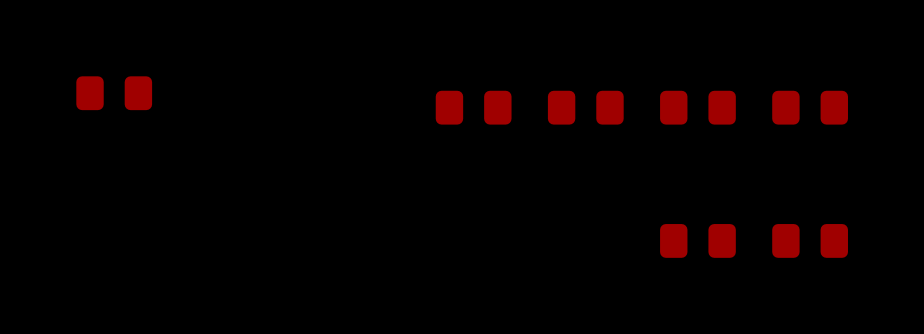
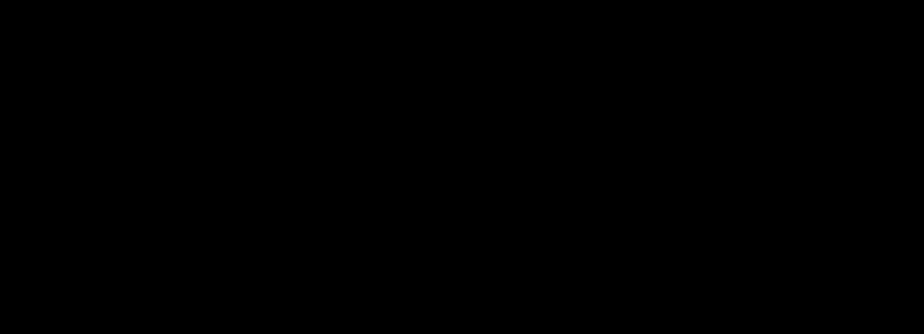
part: (114, 93) -> none
part: (473, 107) -> none
part: (585, 107) -> none
part: (697, 107) -> none
part: (810, 107) -> none
part: (697, 240) -> none
part: (810, 240) -> none

